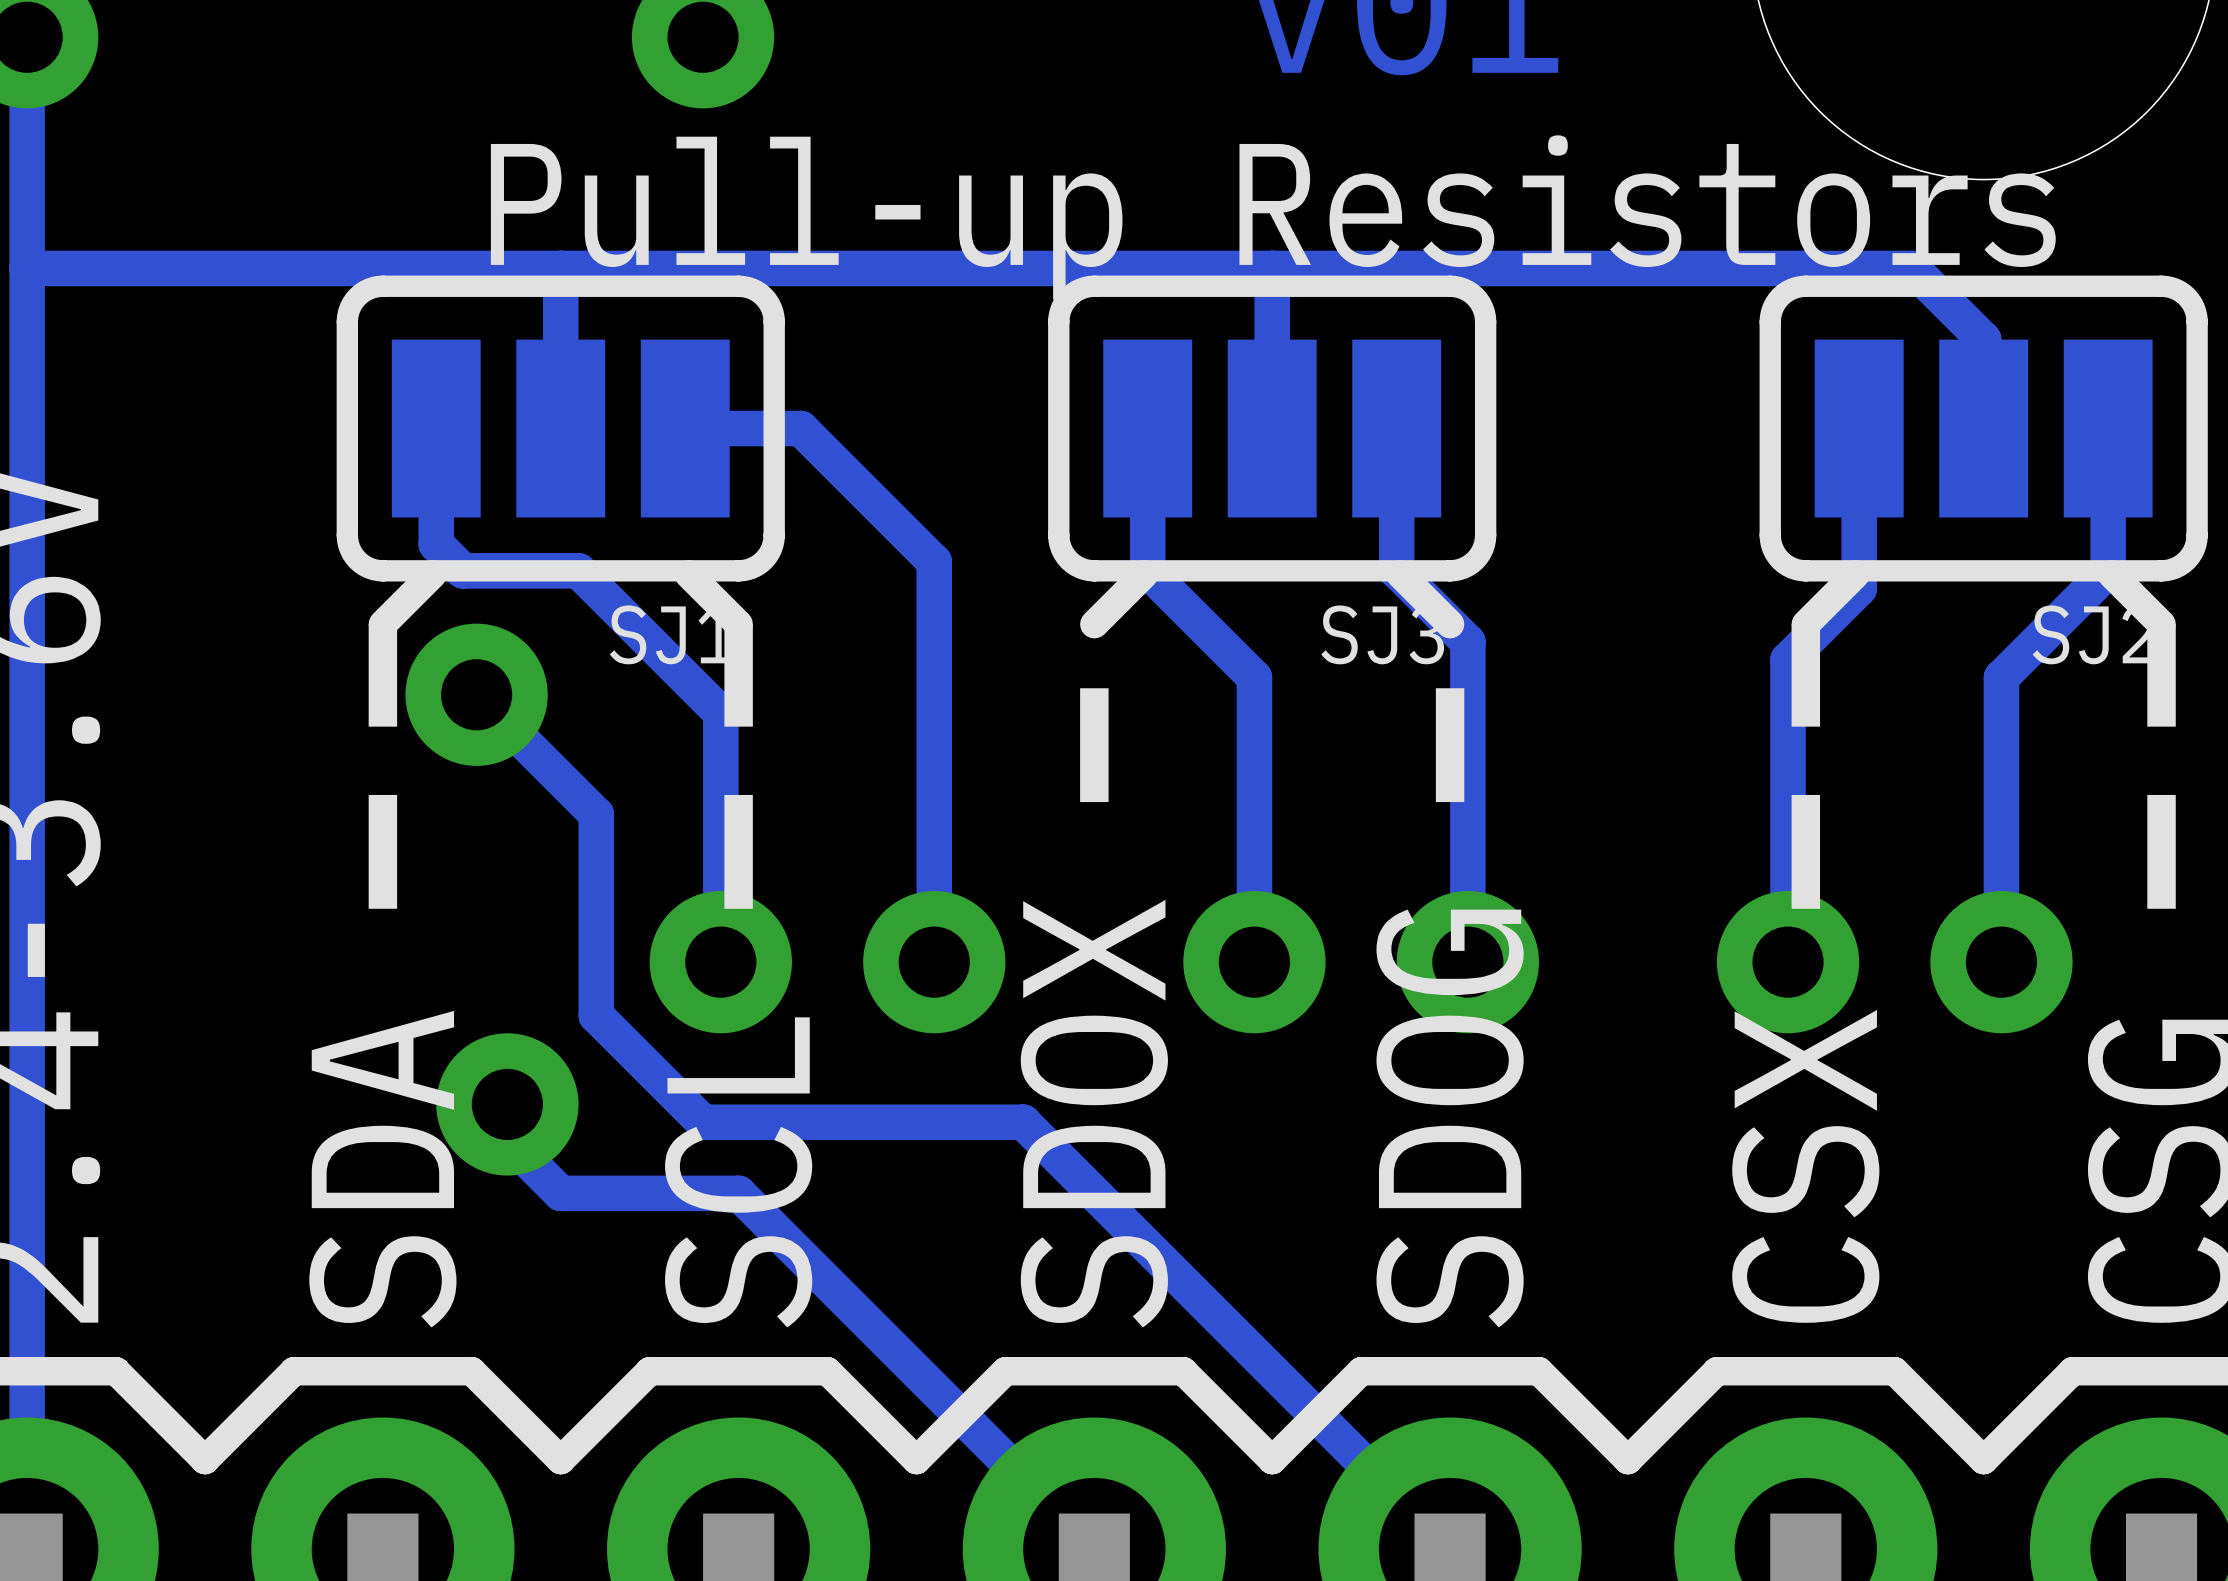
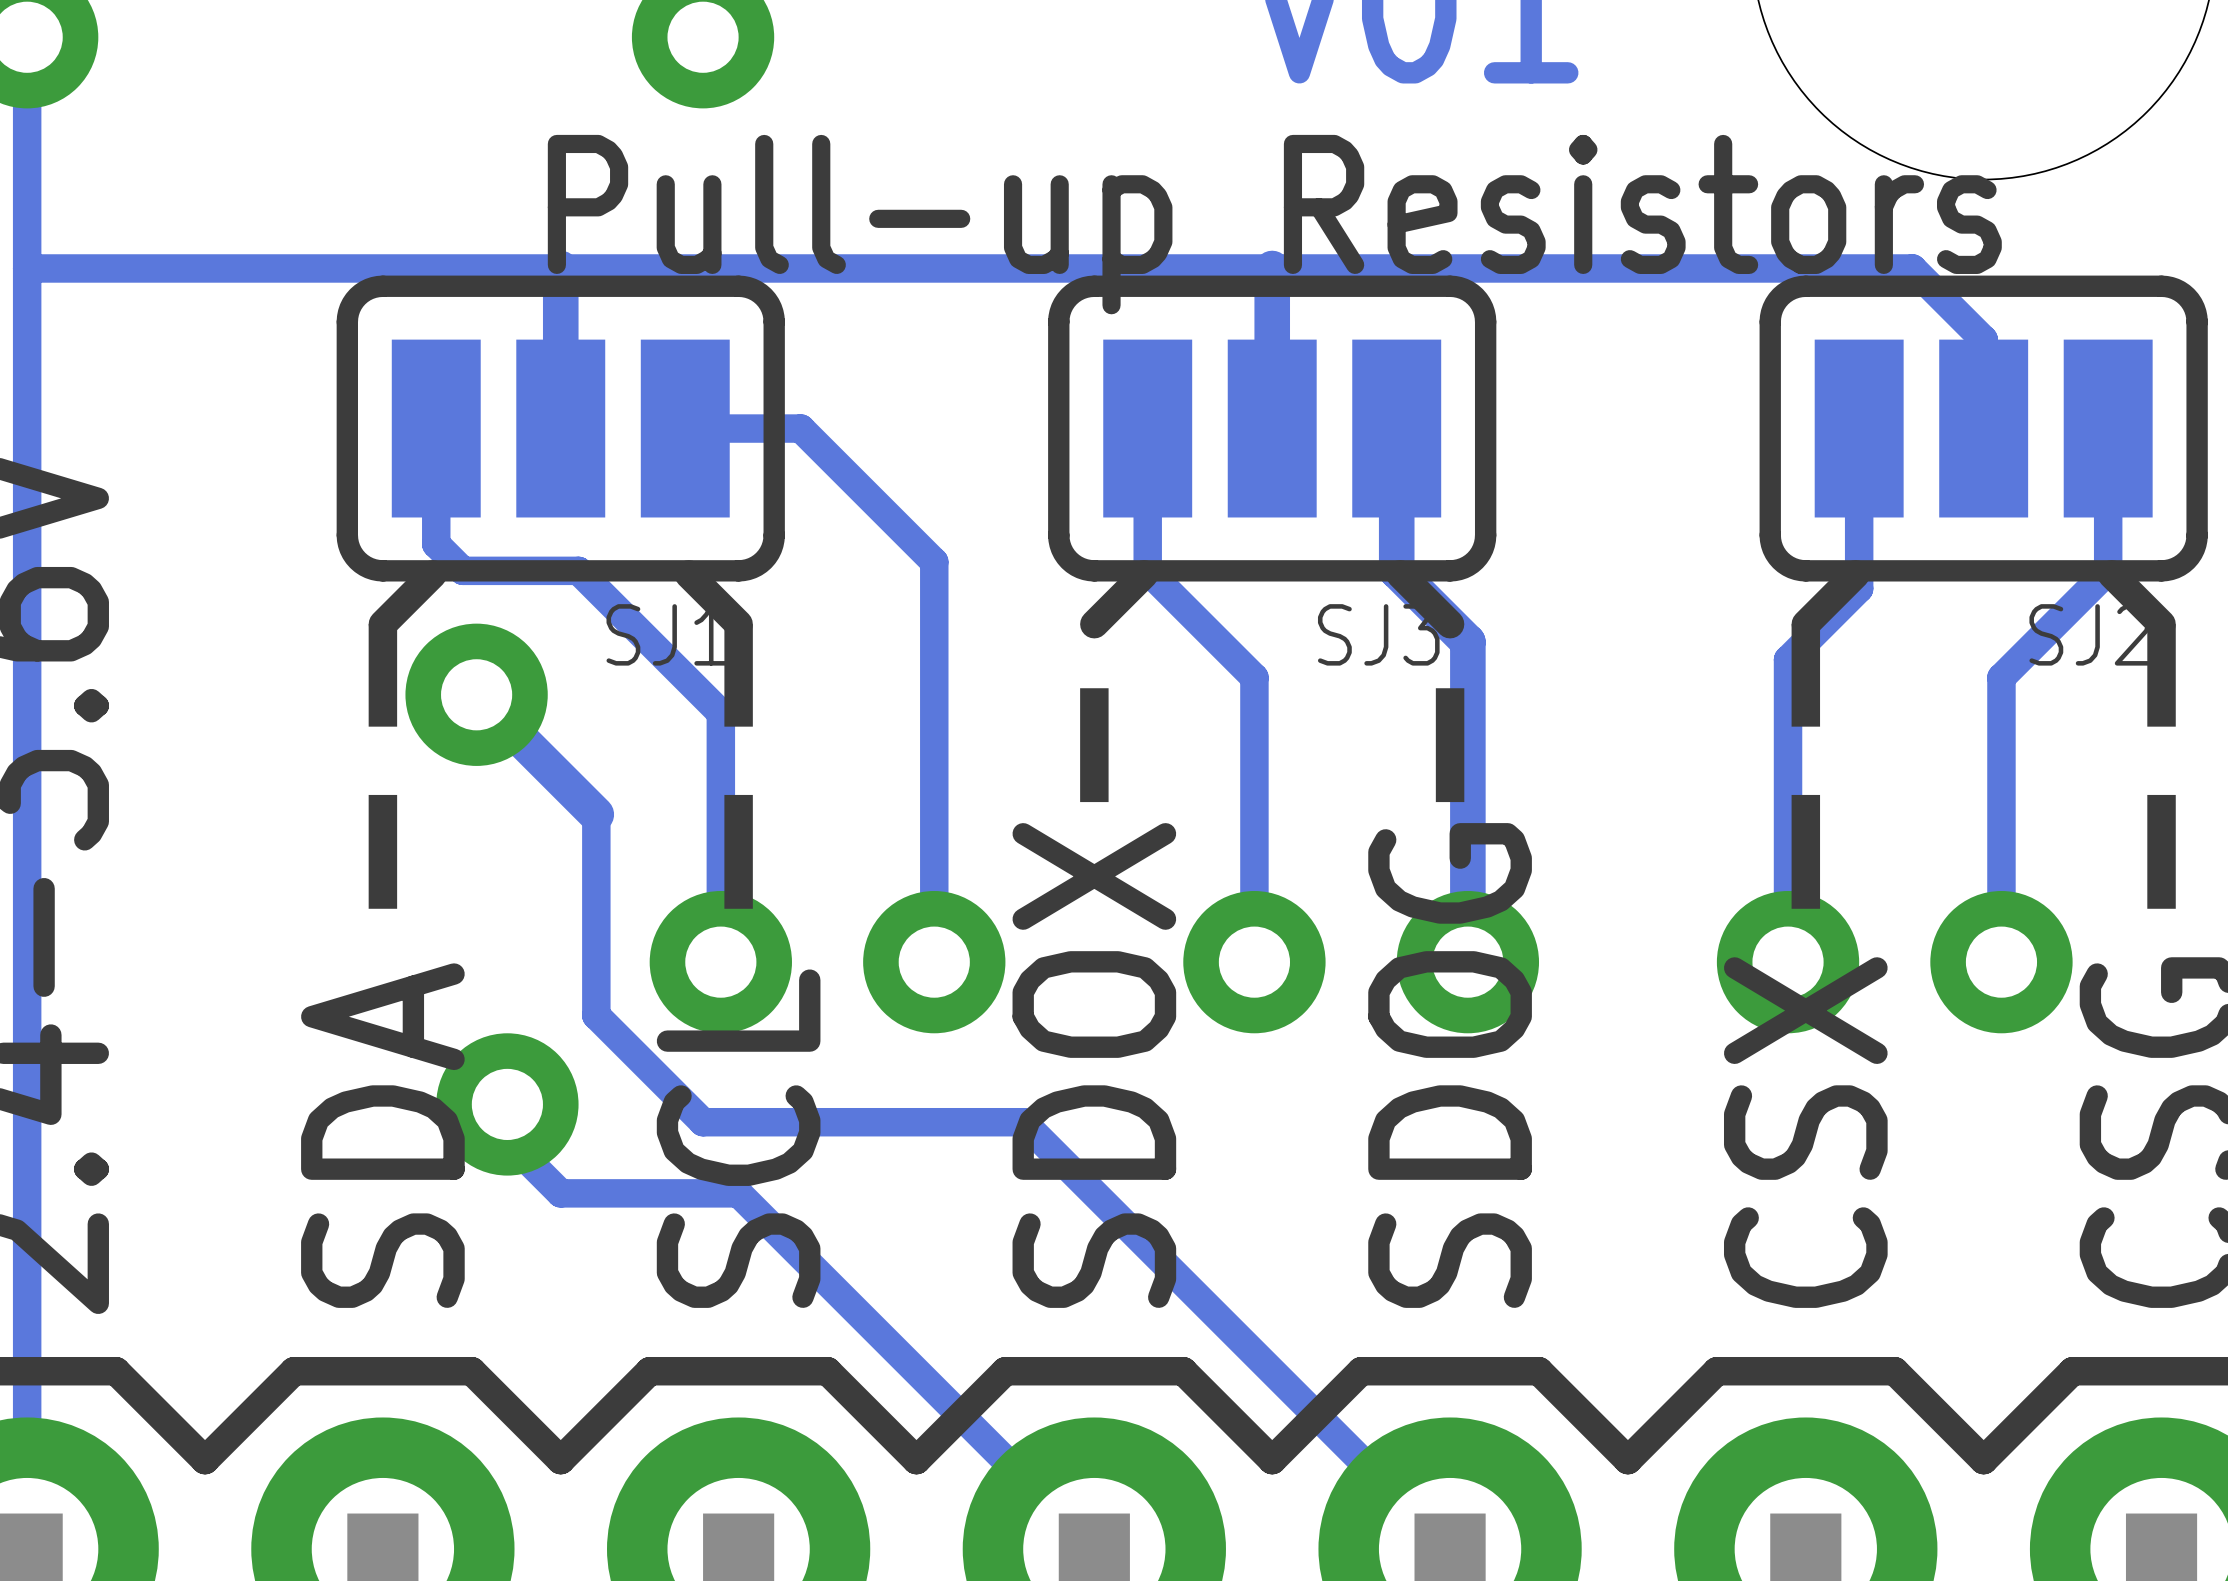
track width: thick (27, 37) (27, 1549) -> thin (27, 37) (27, 1549)
track width: thick (27, 268) (1912, 268) (1983, 339) (1983, 428) -> thin (27, 268) (1912, 268) (1983, 339) (1983, 428)
track width: thick (436, 428) (436, 544) (462, 570) (578, 570) (720, 713) (720, 962) -> thin (436, 428) (436, 544) (462, 570) (578, 570) (720, 713) (720, 962)
track width: thick (685, 428) (800, 428) (934, 561) (934, 962) -> thin (685, 428) (800, 428) (934, 561) (934, 962)
track width: thick (1147, 428) (1147, 570) (1254, 677) (1254, 962) -> thin (1147, 428) (1147, 570) (1254, 677) (1254, 962)
track width: thick (1859, 428) (1859, 588) (1788, 659) (1788, 962) -> thin (1859, 428) (1859, 588) (1788, 659) (1788, 962)
track width: thick (2108, 428) (2108, 570) (2001, 677) (2001, 962) -> thin (2108, 428) (2108, 570) (2001, 677) (2001, 962)
track width: thick (596, 814) (596, 1015) (703, 1122) (1023, 1122) (1450, 1549) -> thin (596, 814) (596, 1015) (703, 1122) (1023, 1122) (1450, 1549)
track width: thick (507, 1104) (507, 1140) (560, 1193) (738, 1193) (1094, 1549) -> thin (507, 1104) (507, 1140) (560, 1193) (738, 1193) (1094, 1549)

